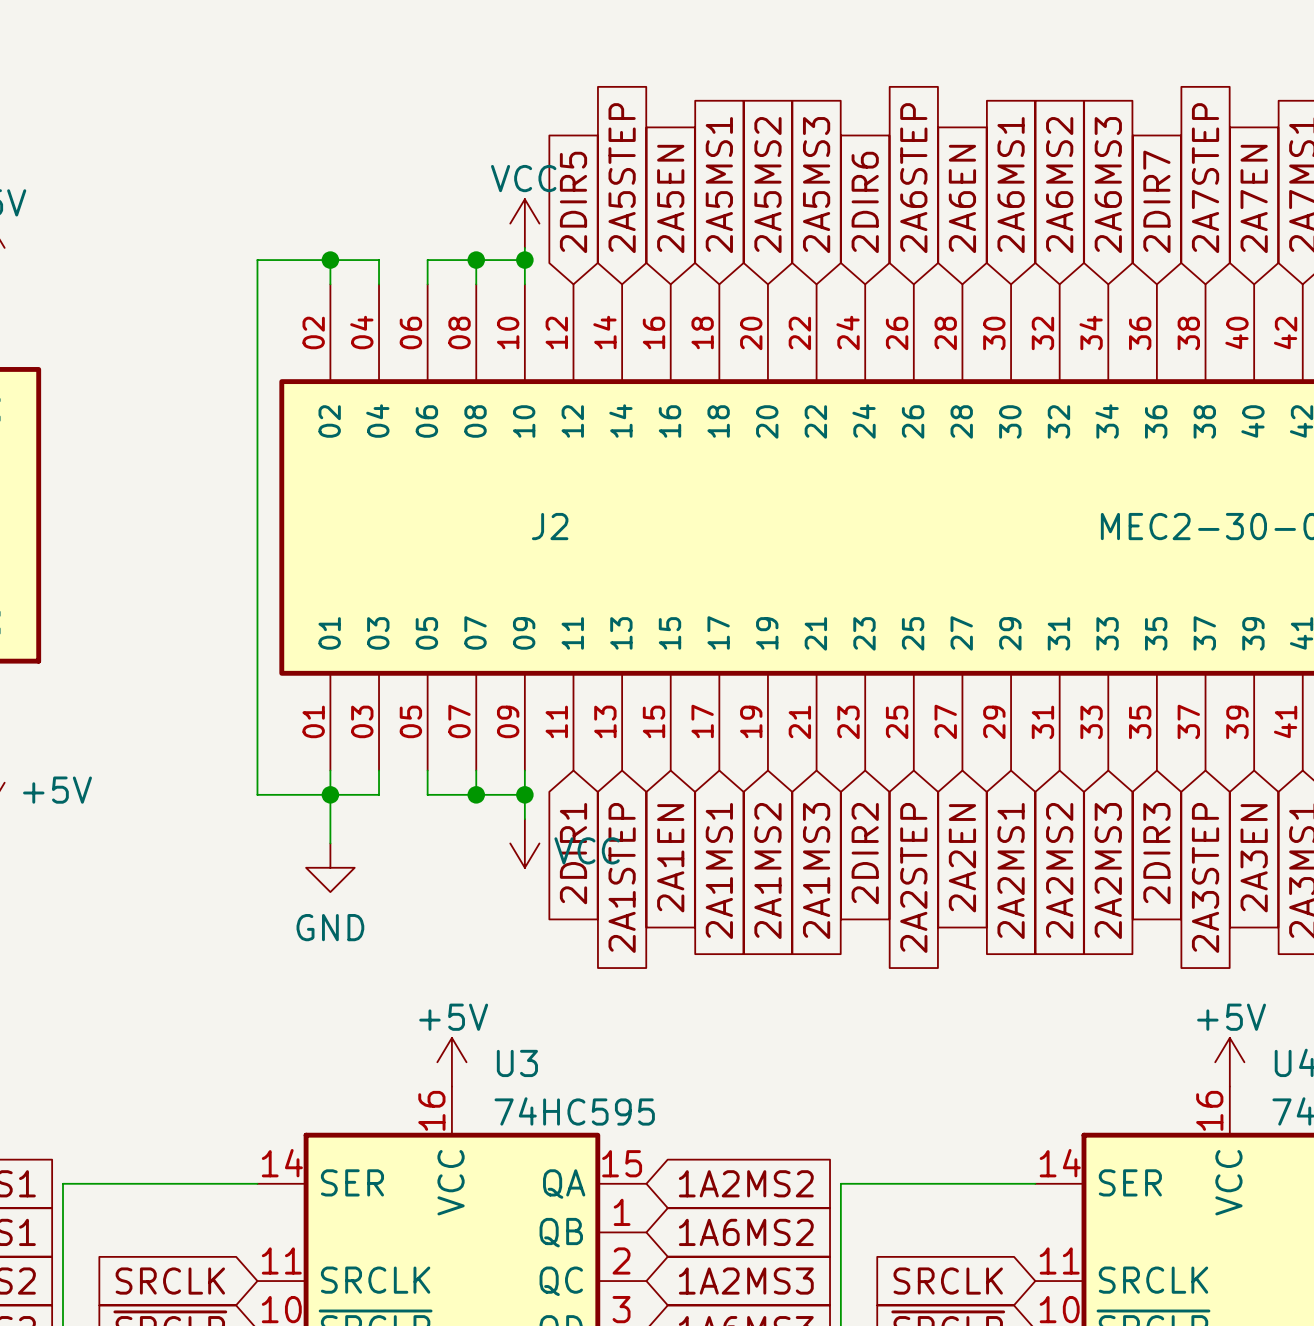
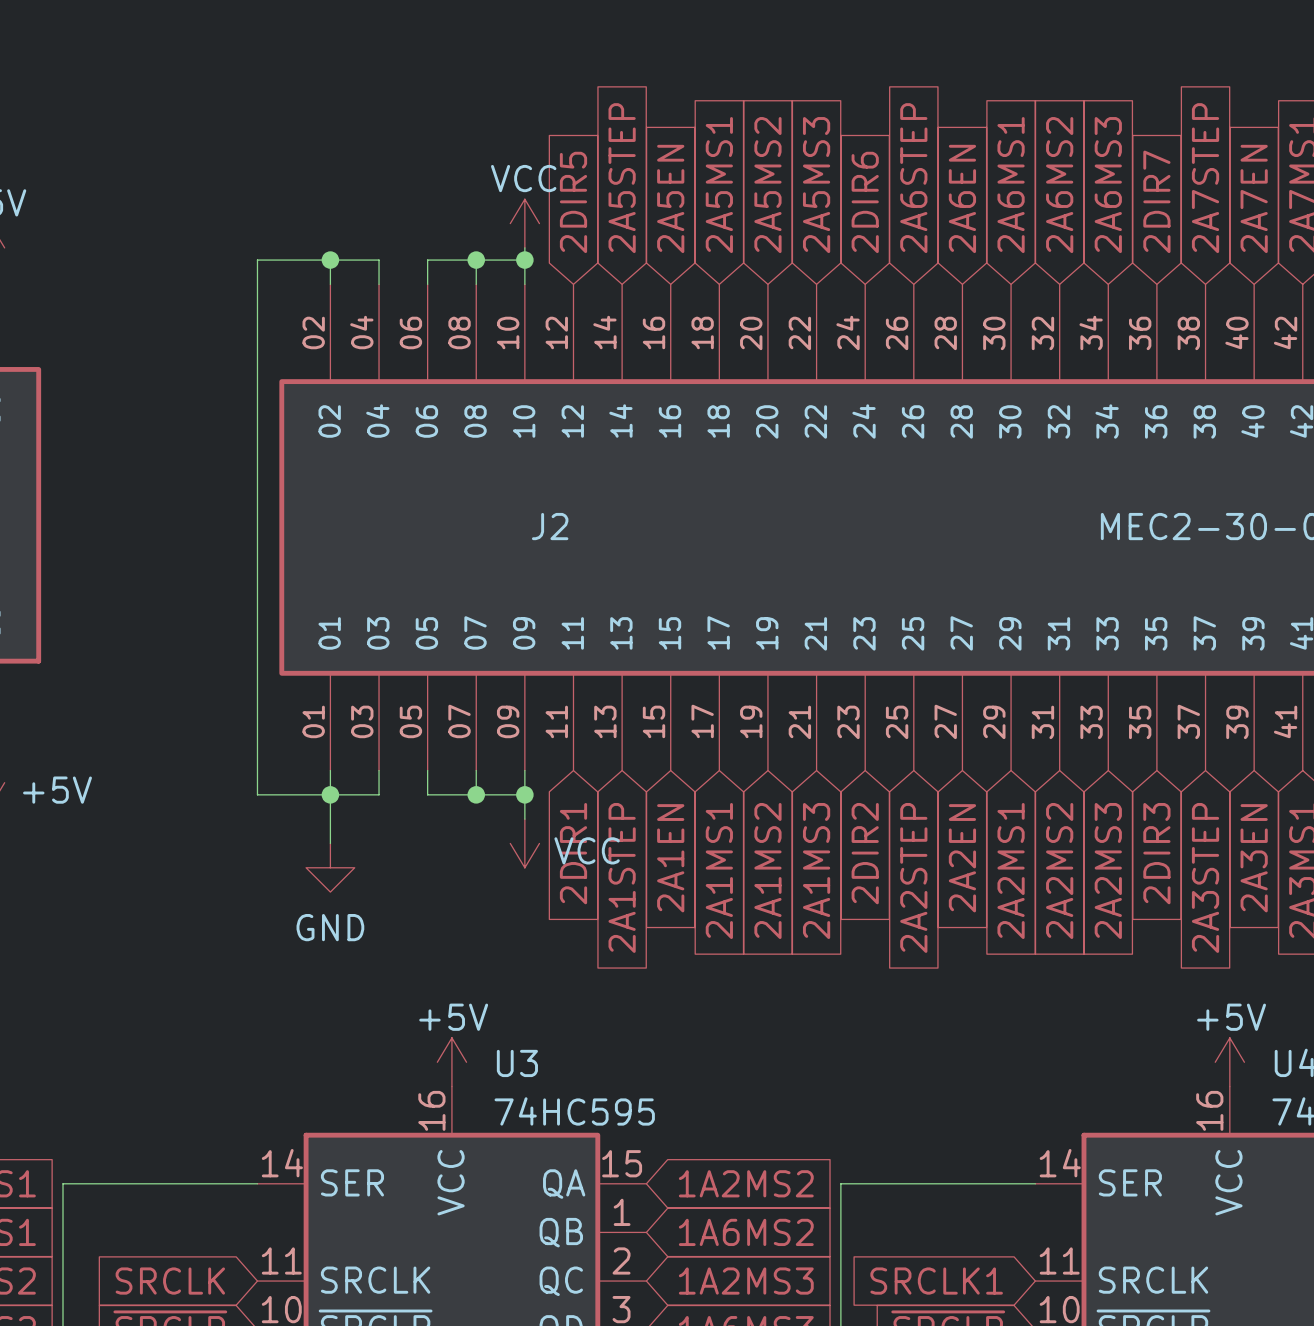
global label: SRCLK (948, 1281) -> SRCLK1 (936, 1281)

